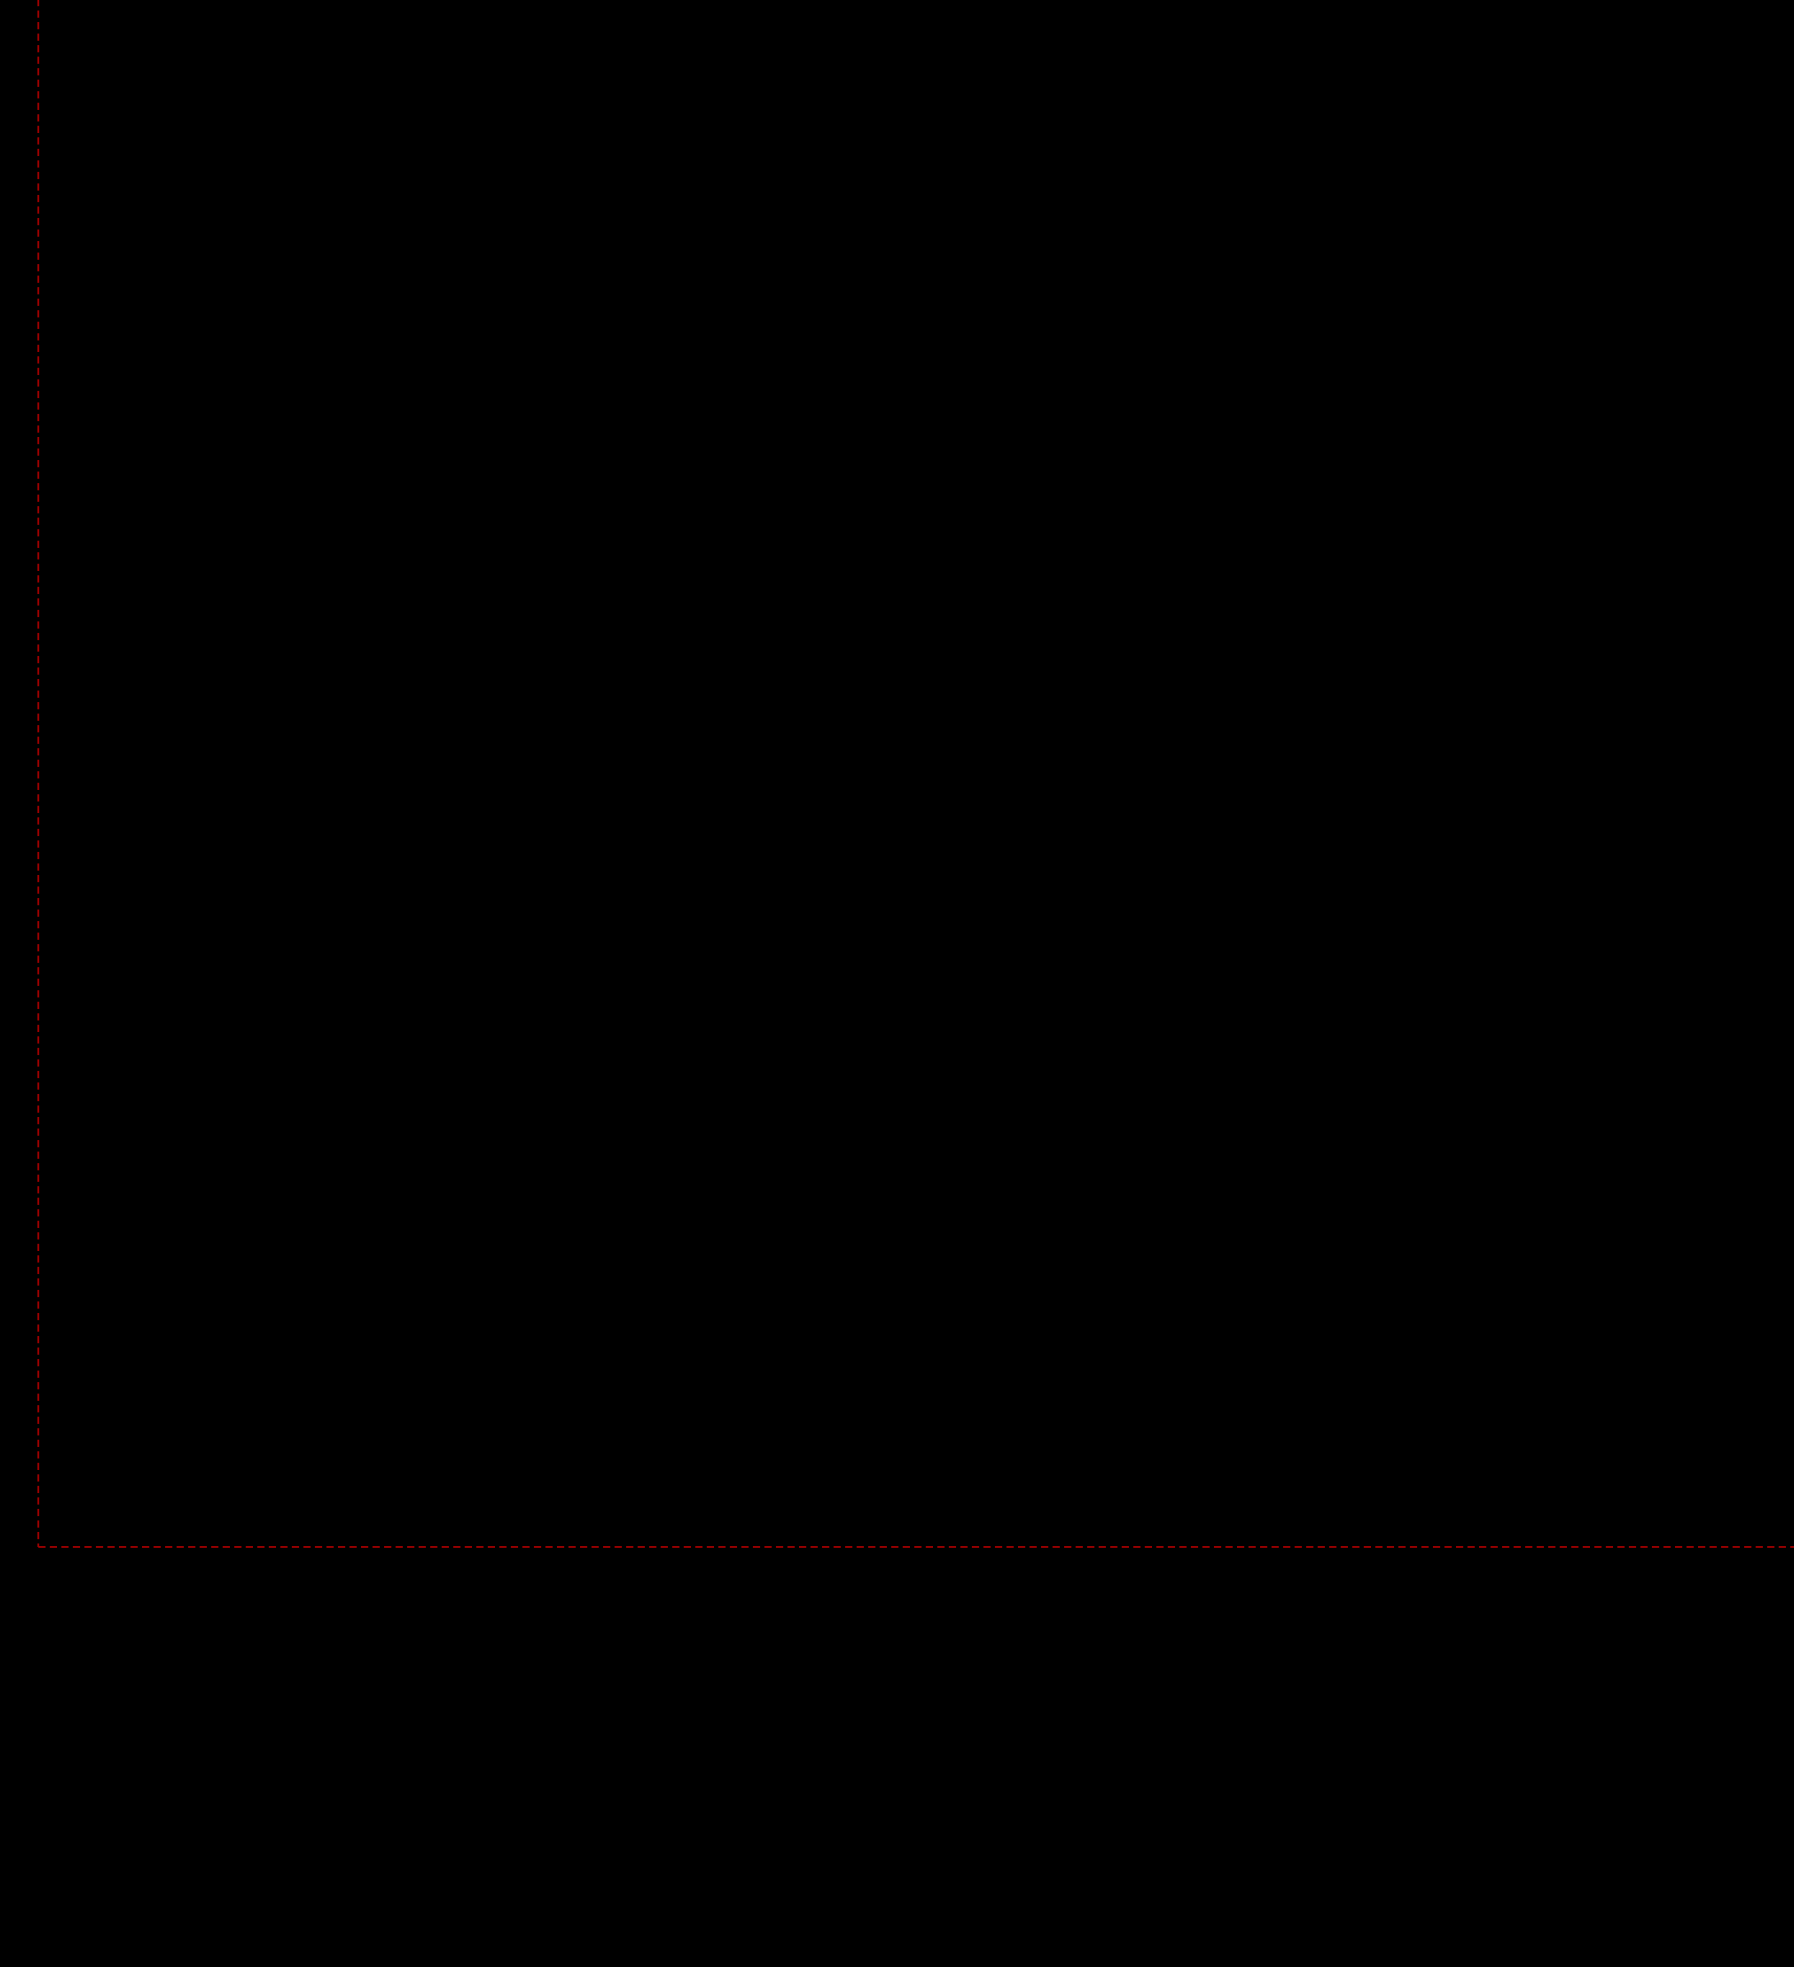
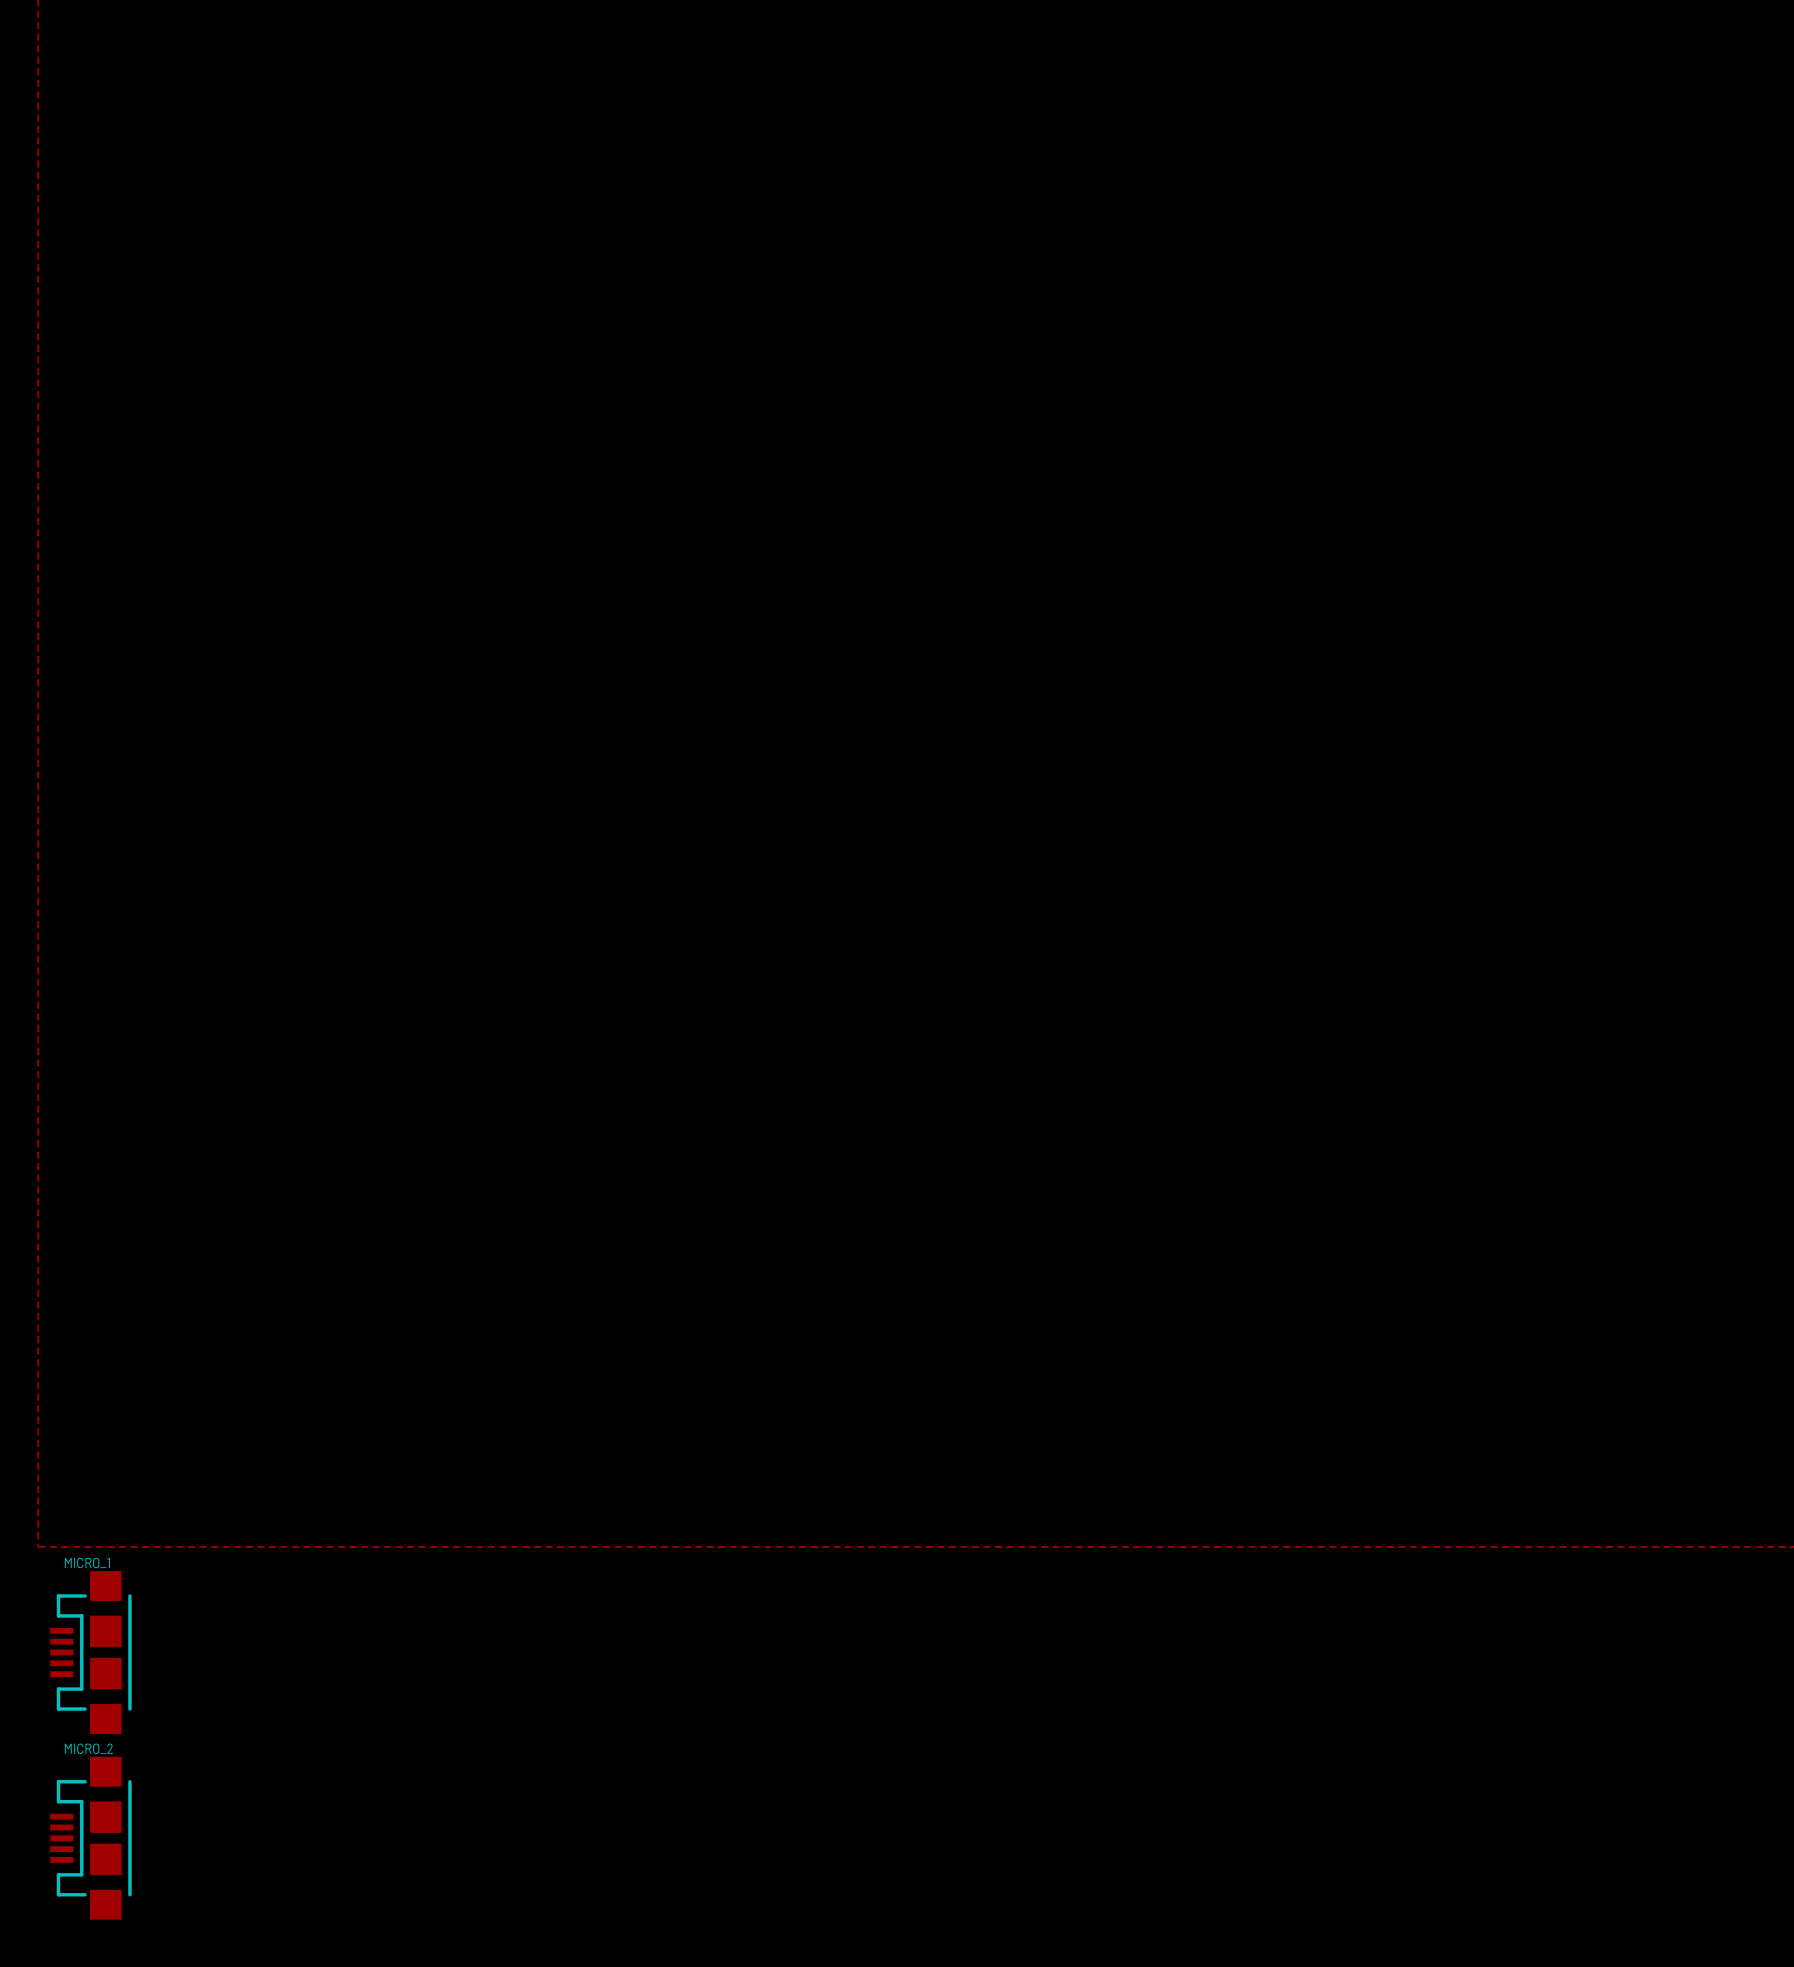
MICRO_1: none -> (90, 1652)
MICRO_2: none -> (90, 1838)

